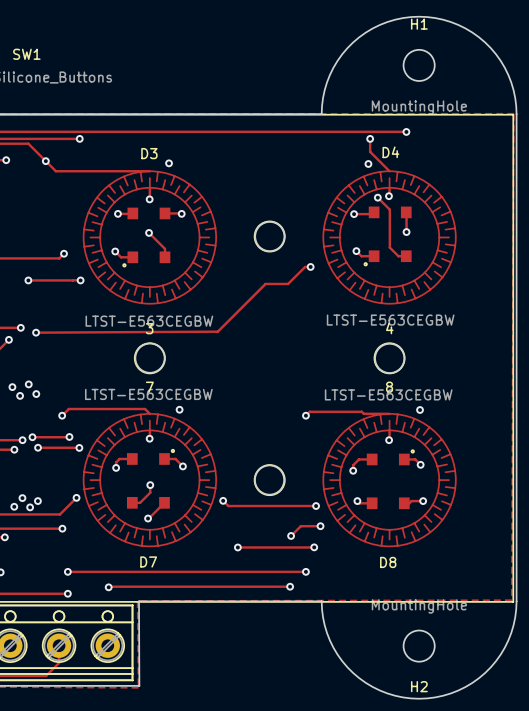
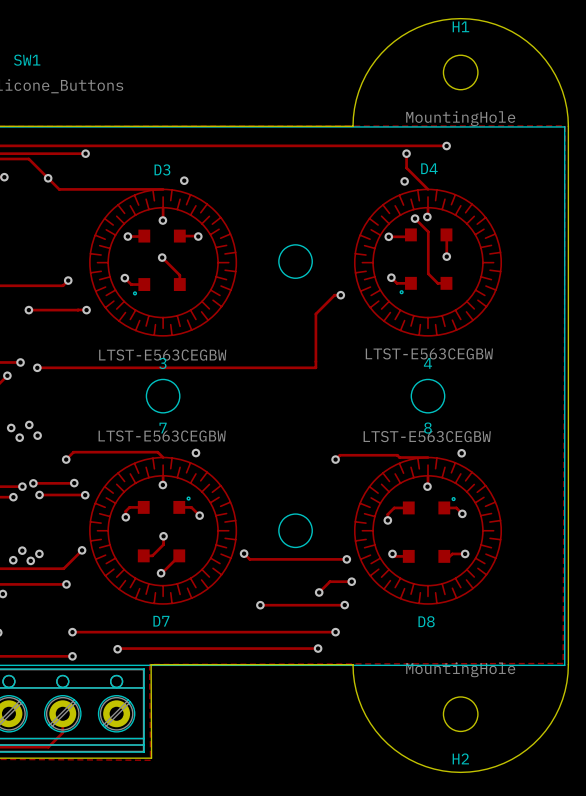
round board edge: [254, 221, 285, 252] -> none
track: (288, 283) (265, 283) (217, 331) (36, 332) -> (315, 314) (315, 367) (37, 367)
round board edge: [135, 343, 165, 374] -> none
round board edge: [374, 343, 405, 374] -> none
round board edge: [254, 465, 285, 495] -> none

